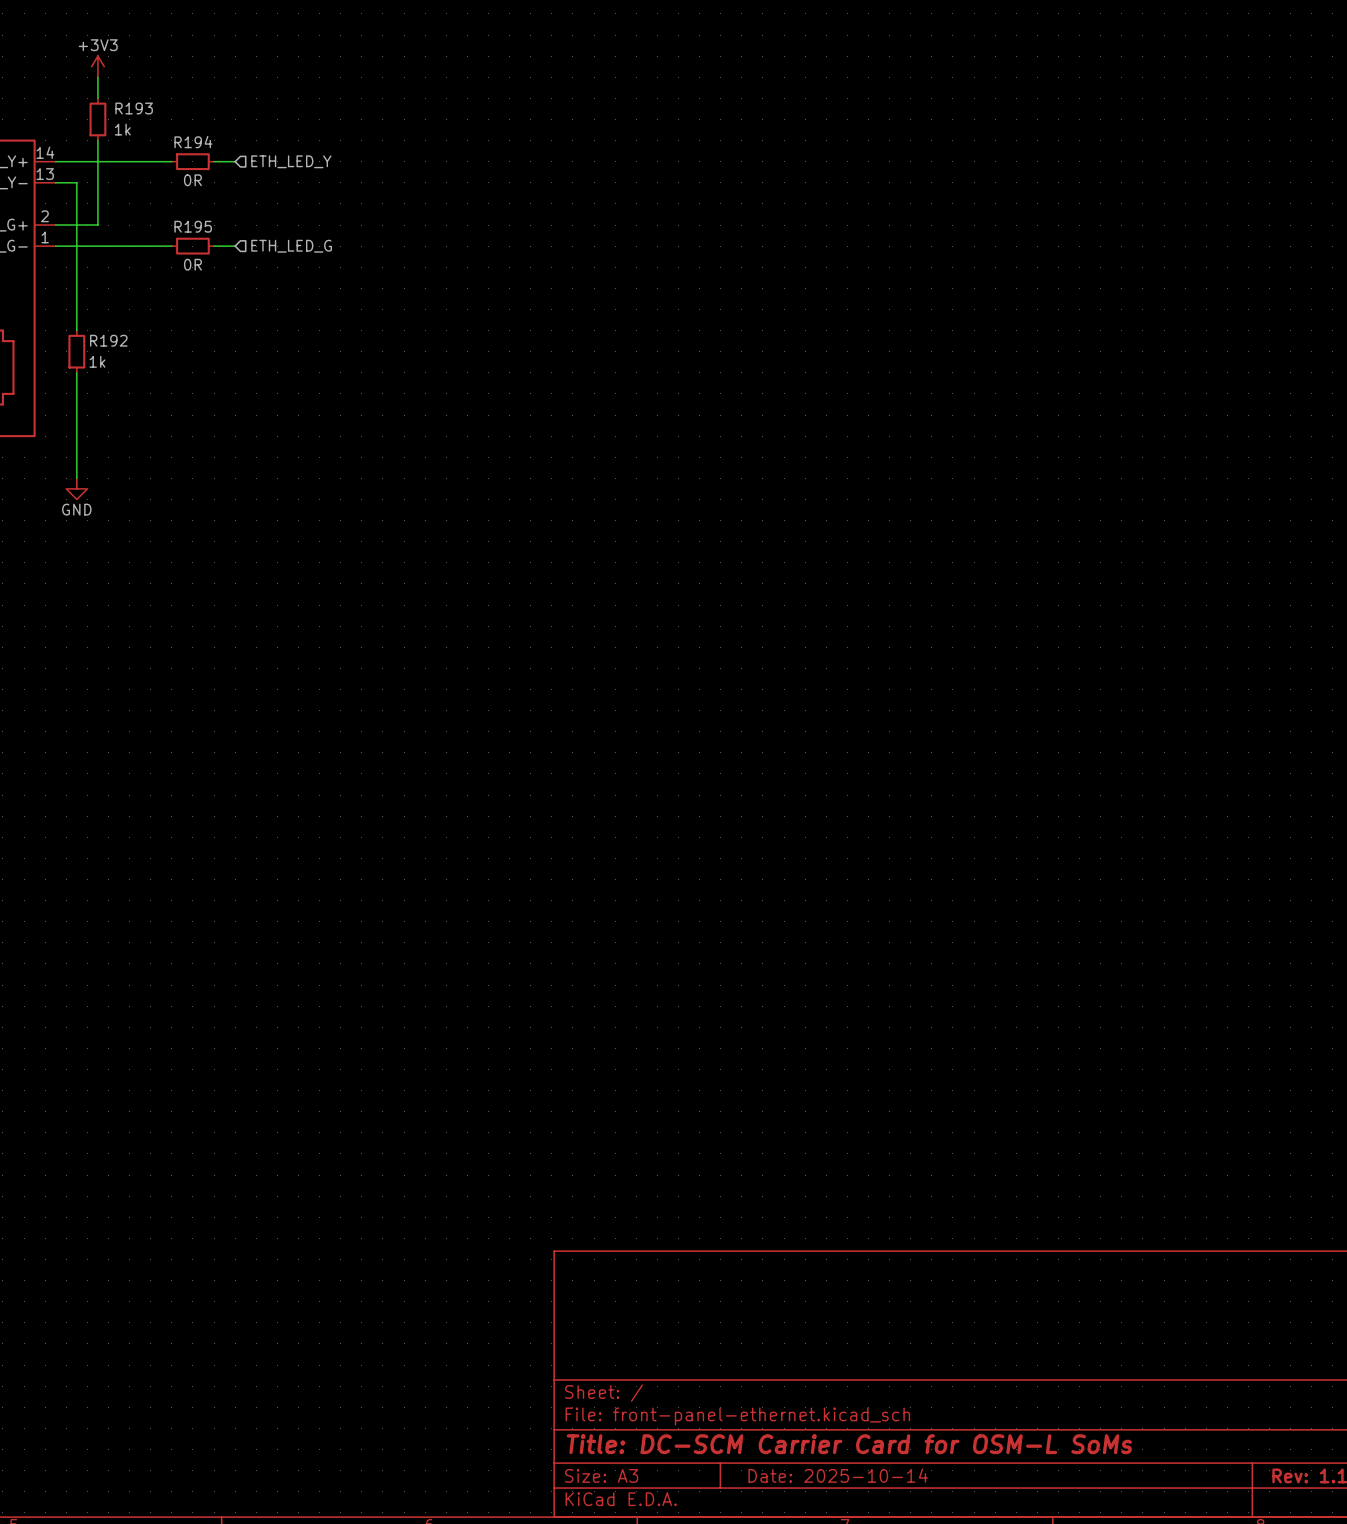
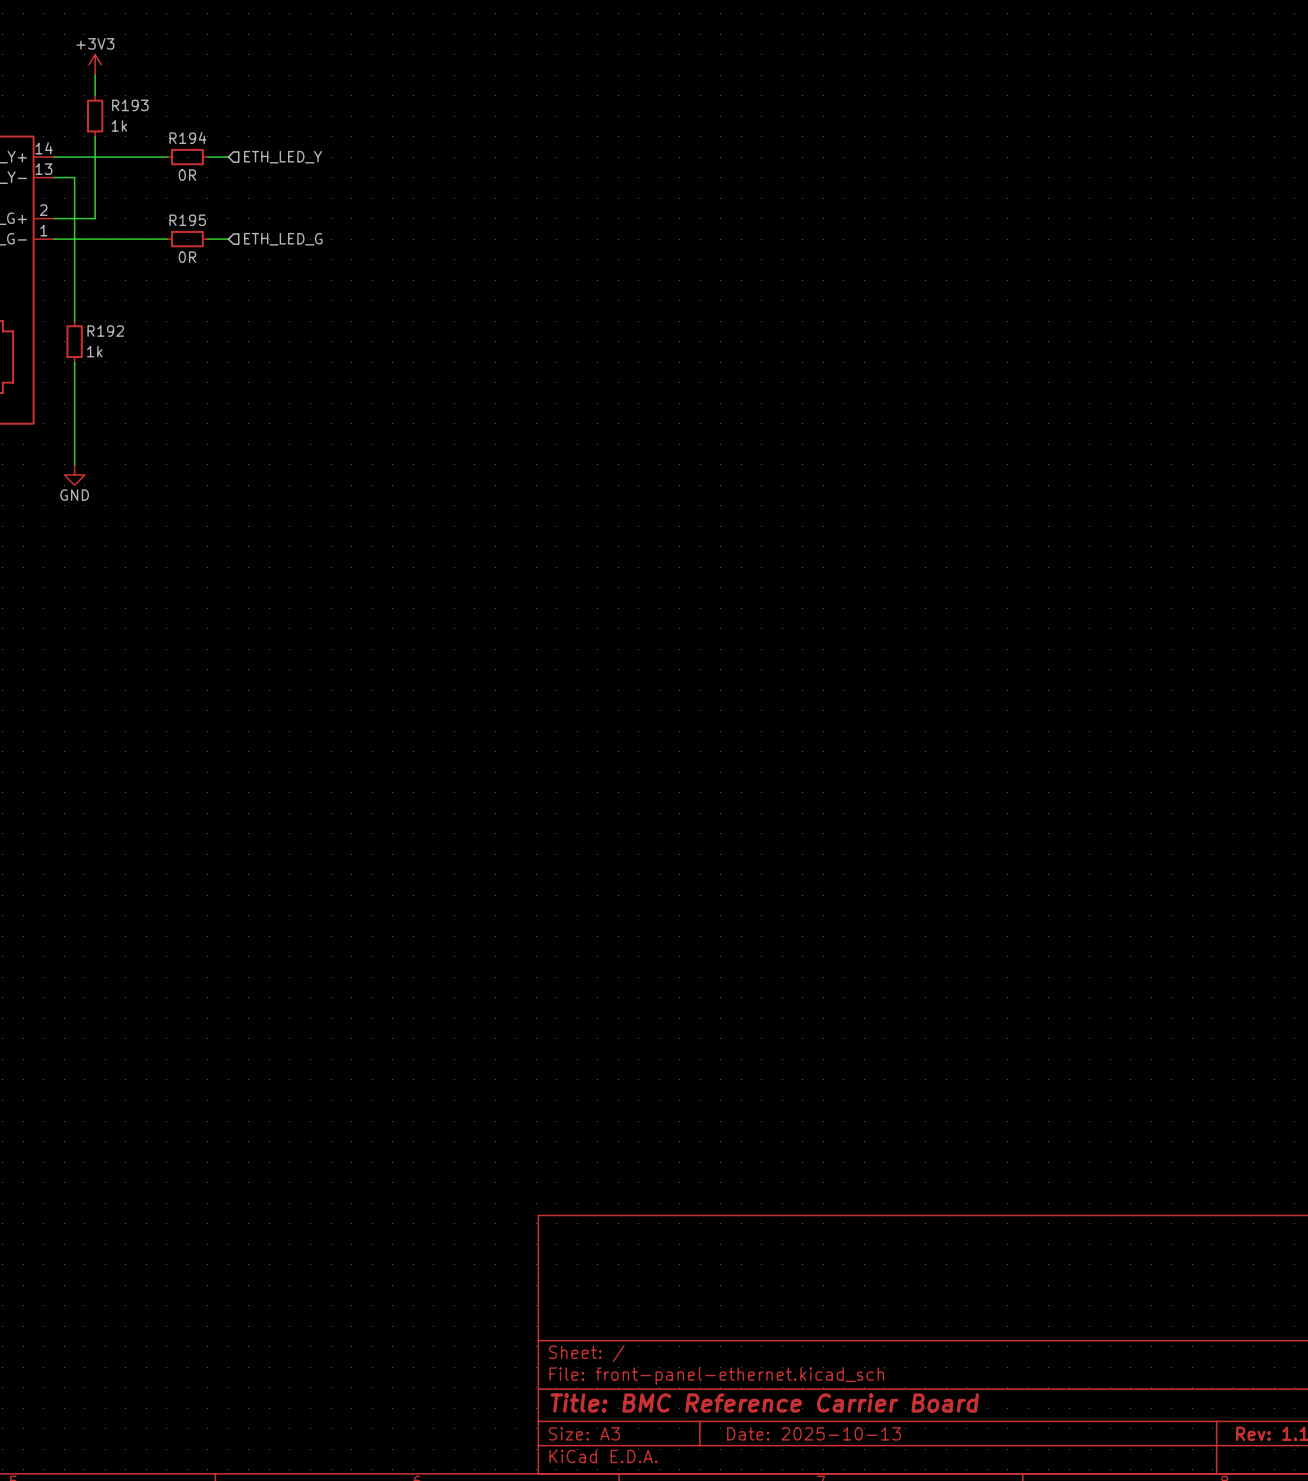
title block: Title: DC-SCM Carrier Card for OSM-L SoMs (849, 1444) -> Title: BMC Reference Carrier Board (764, 1403)
title block: Date: 2025-10-14 (838, 1475) -> Date: 2025-10-13 (813, 1433)

